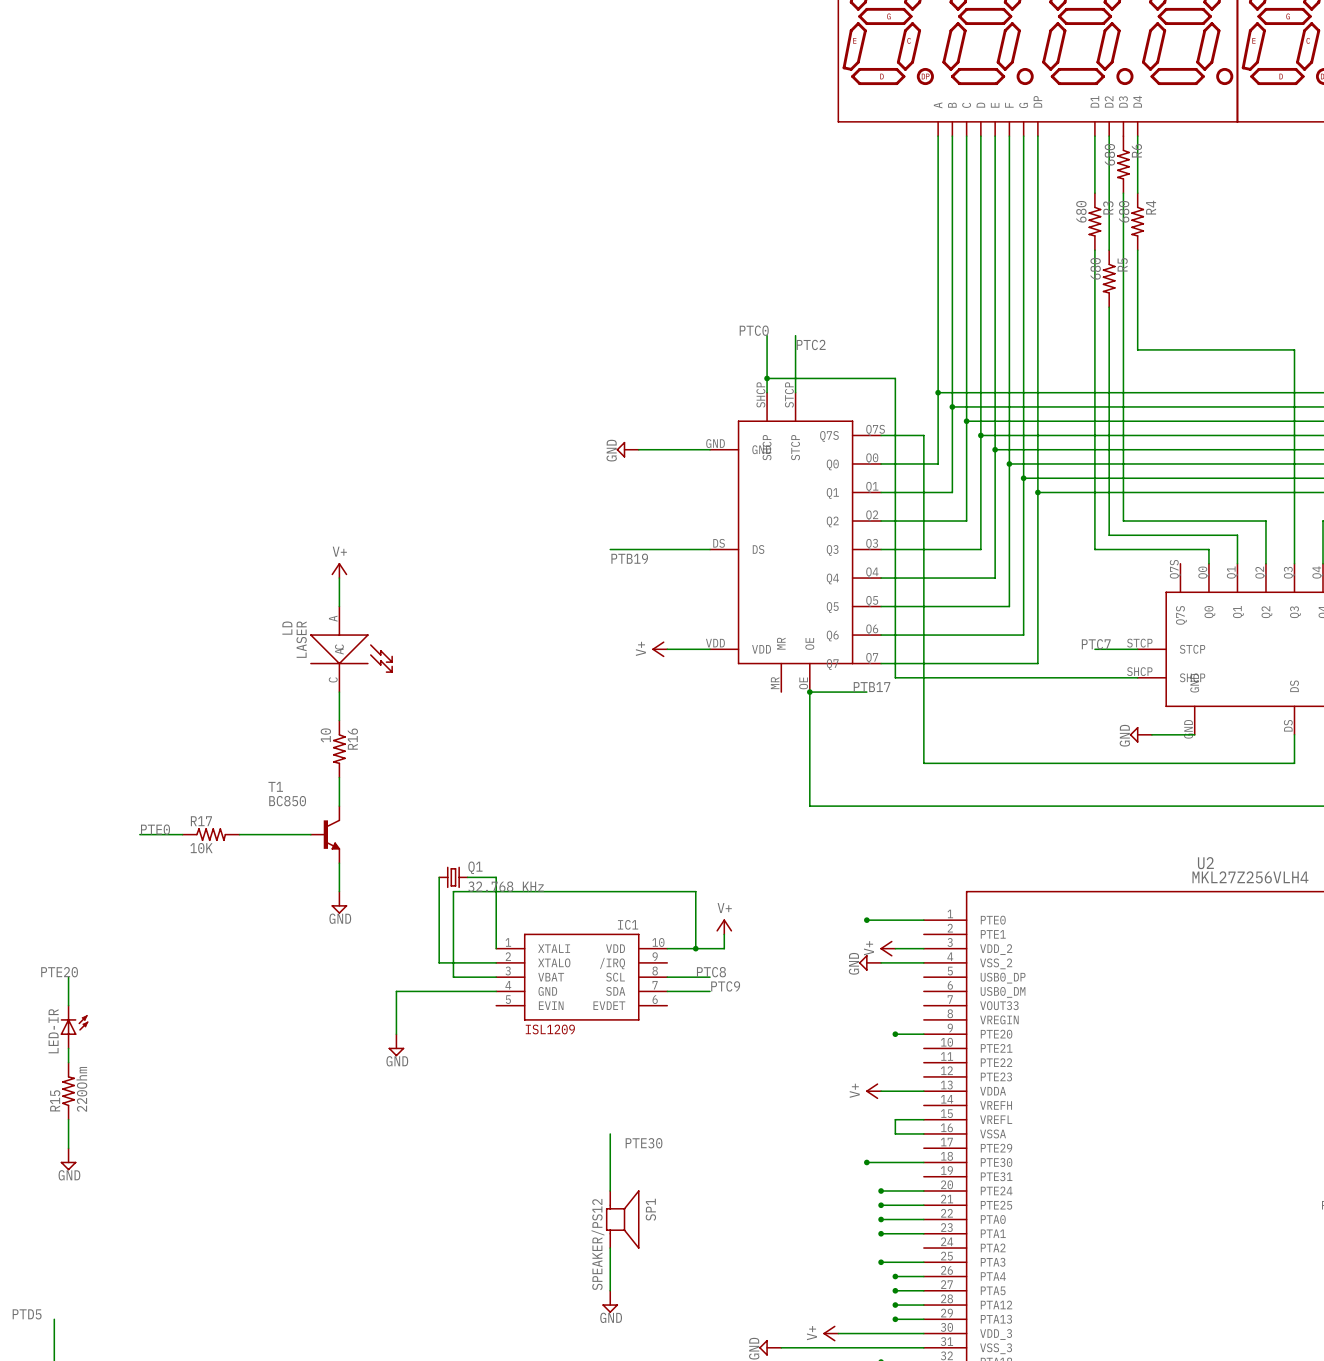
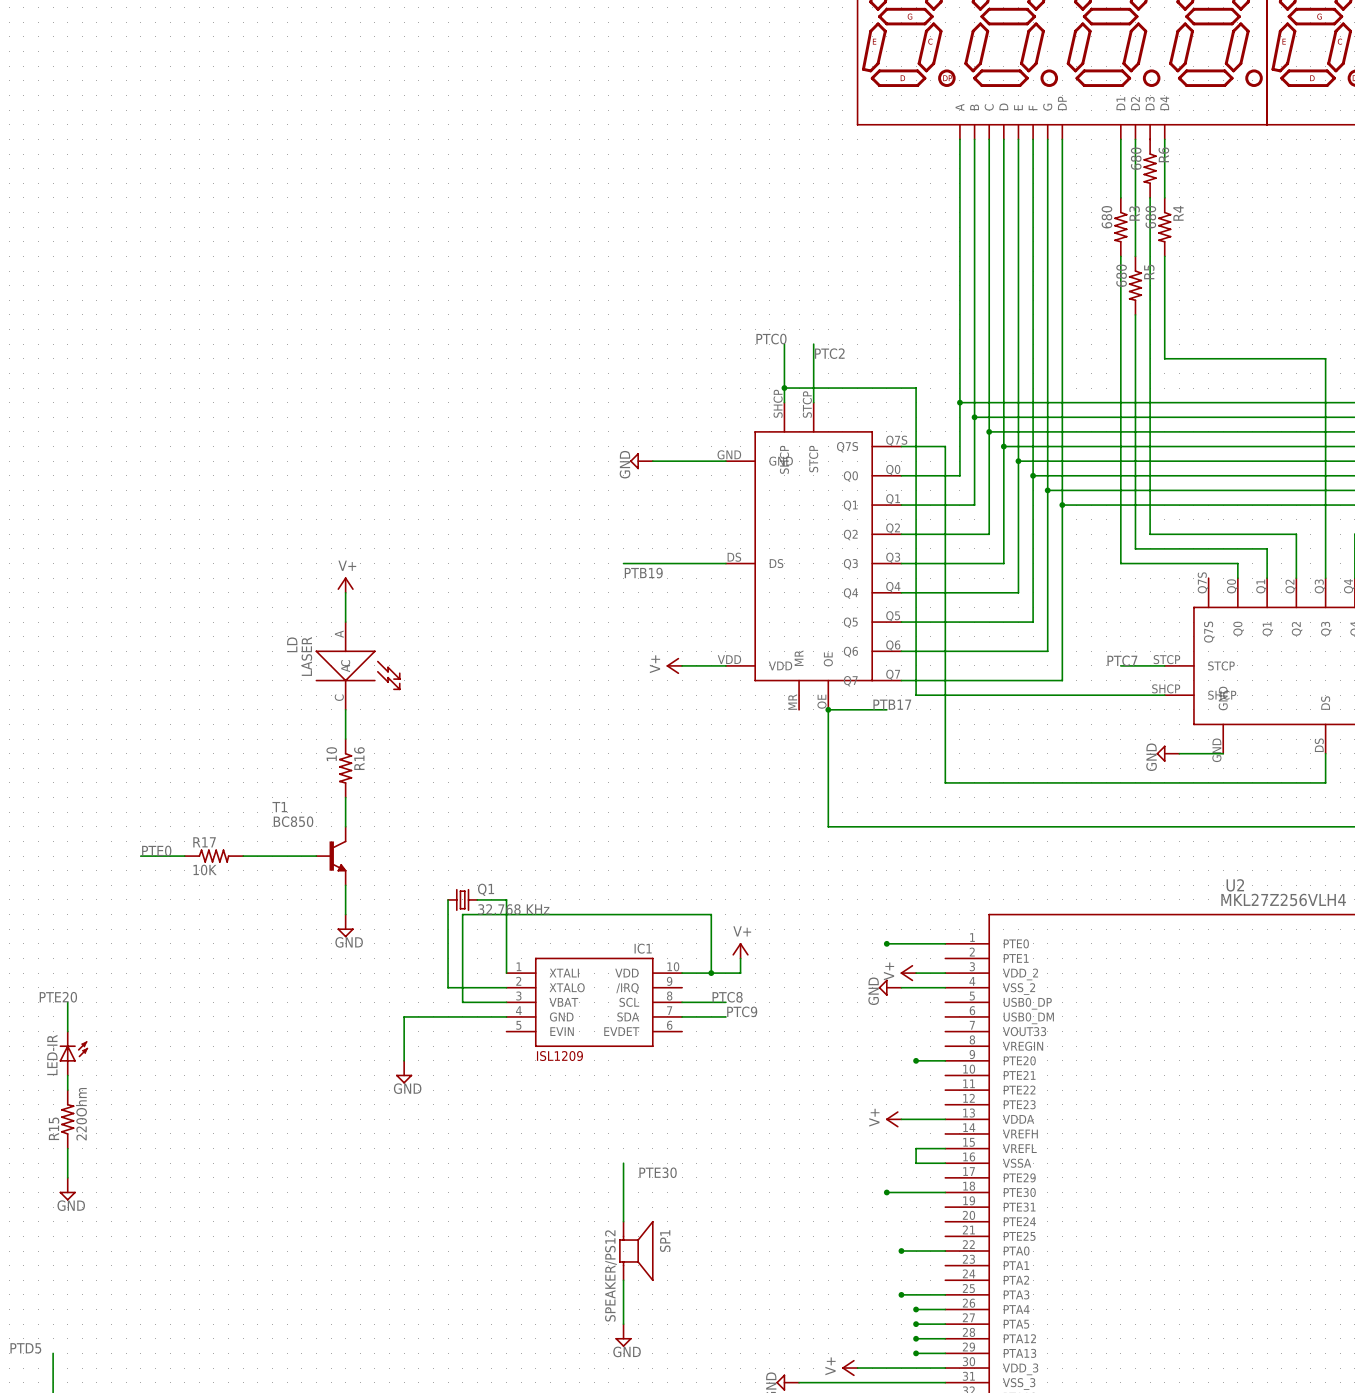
wire: (881, 1190) (923, 1190) -> none
junction: (881, 1190) -> none
wire: (881, 1205) (923, 1205) -> none
junction: (881, 1205) -> none
wire: (881, 1233) (923, 1233) -> none
junction: (881, 1233) -> none

